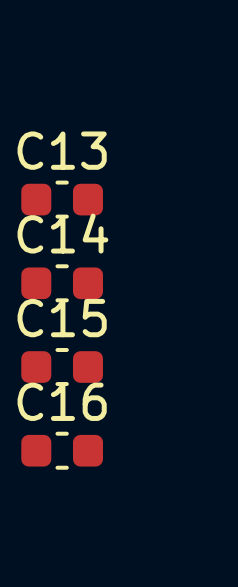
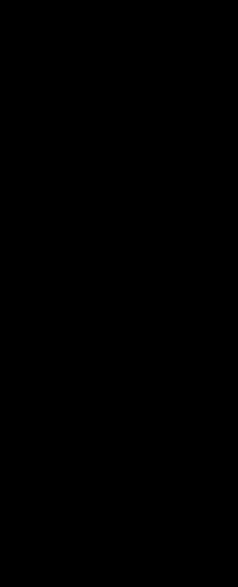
C13: (62, 199) -> none
C14: (62, 283) -> none
C15: (62, 367) -> none
C16: (62, 450) -> none

